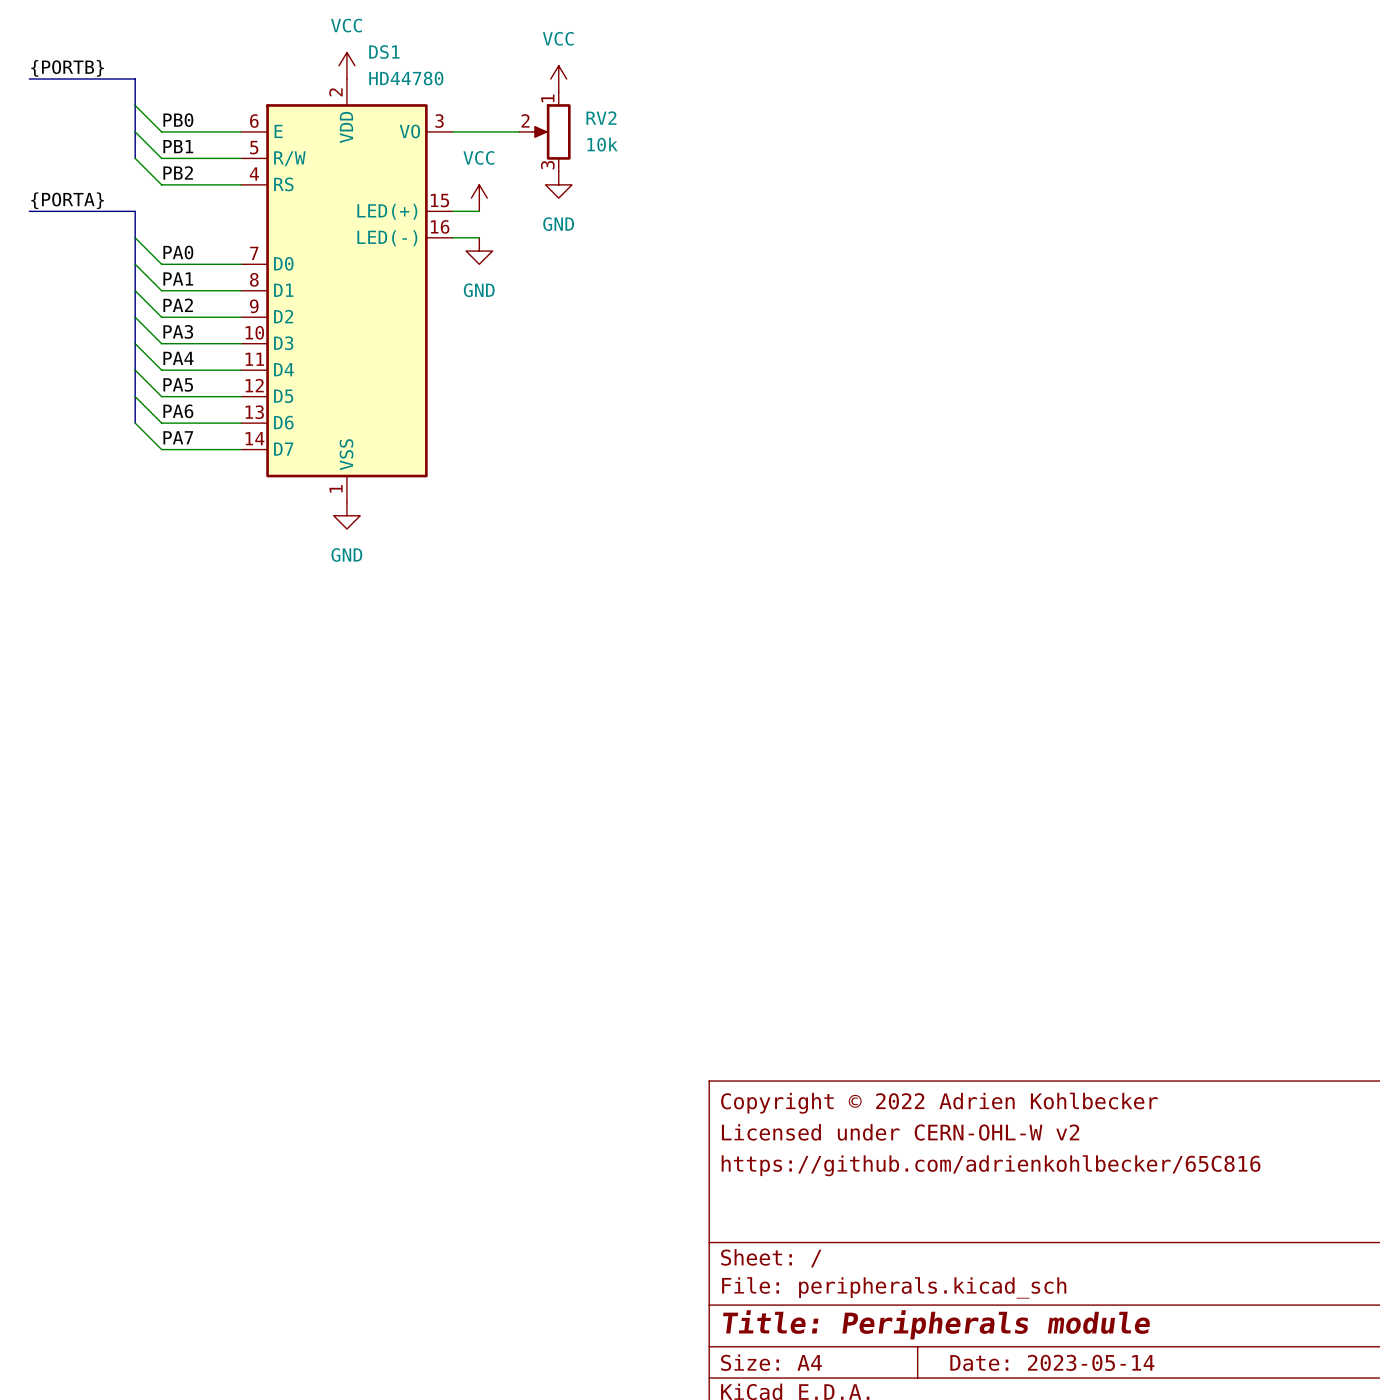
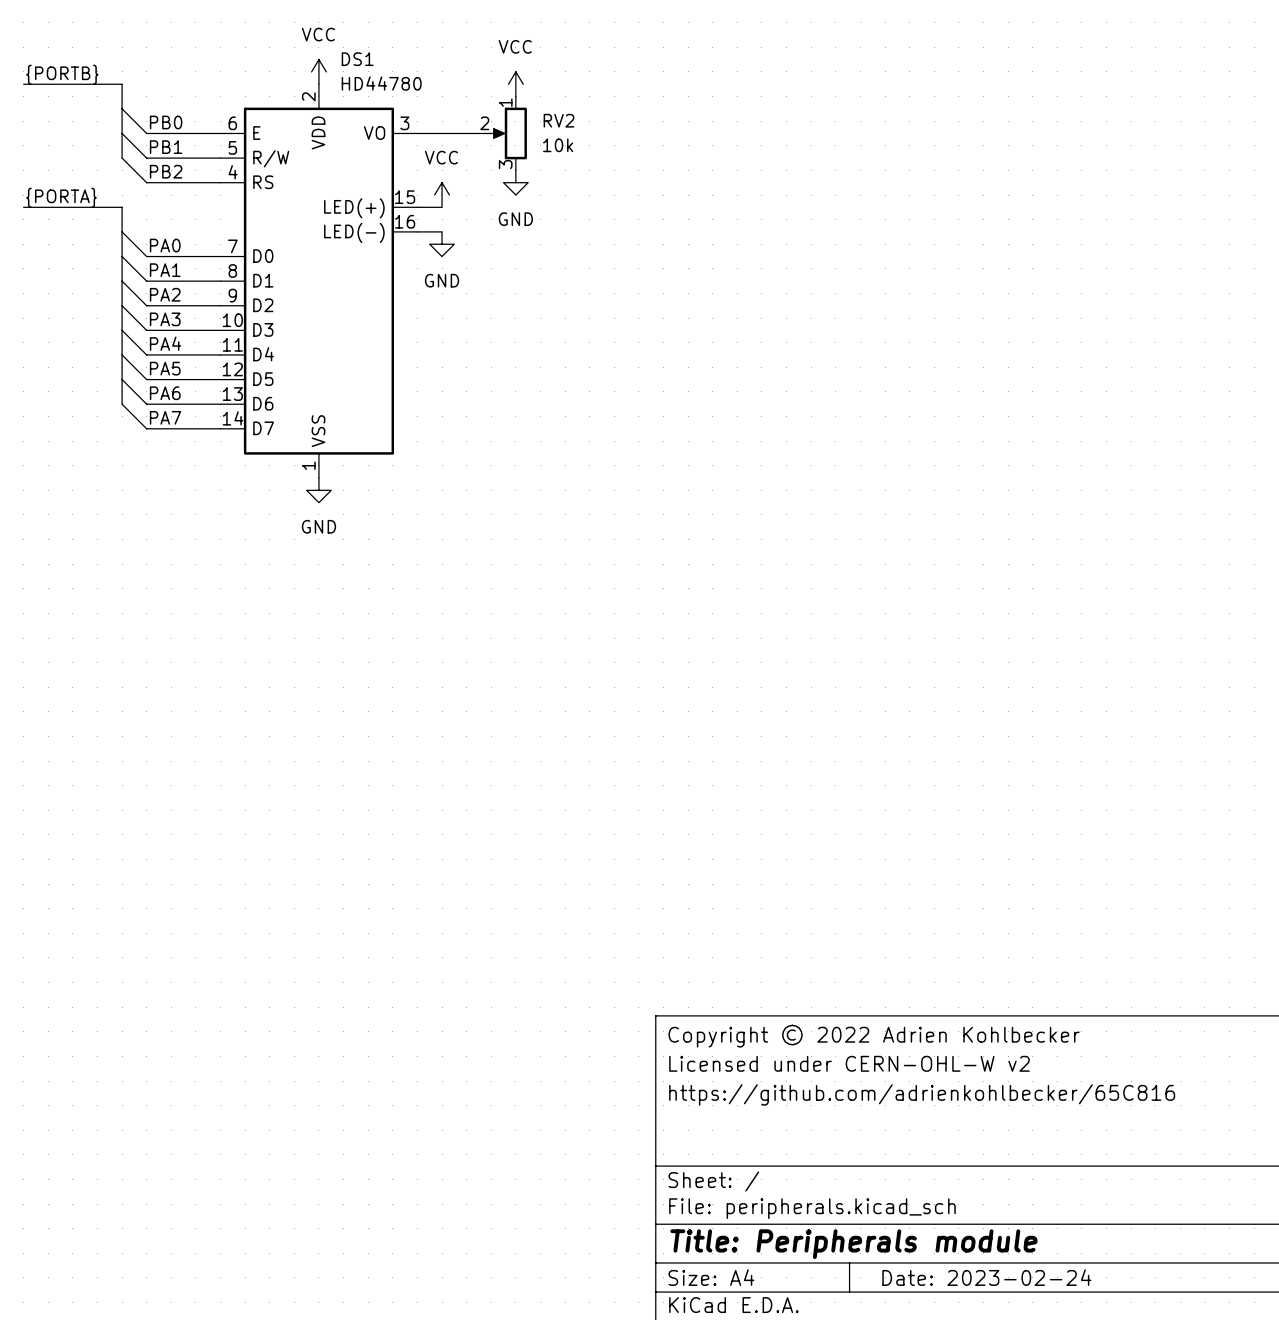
title block: Date: 2023-05-14 (1052, 1362) -> Date: 2023-02-24 (986, 1277)

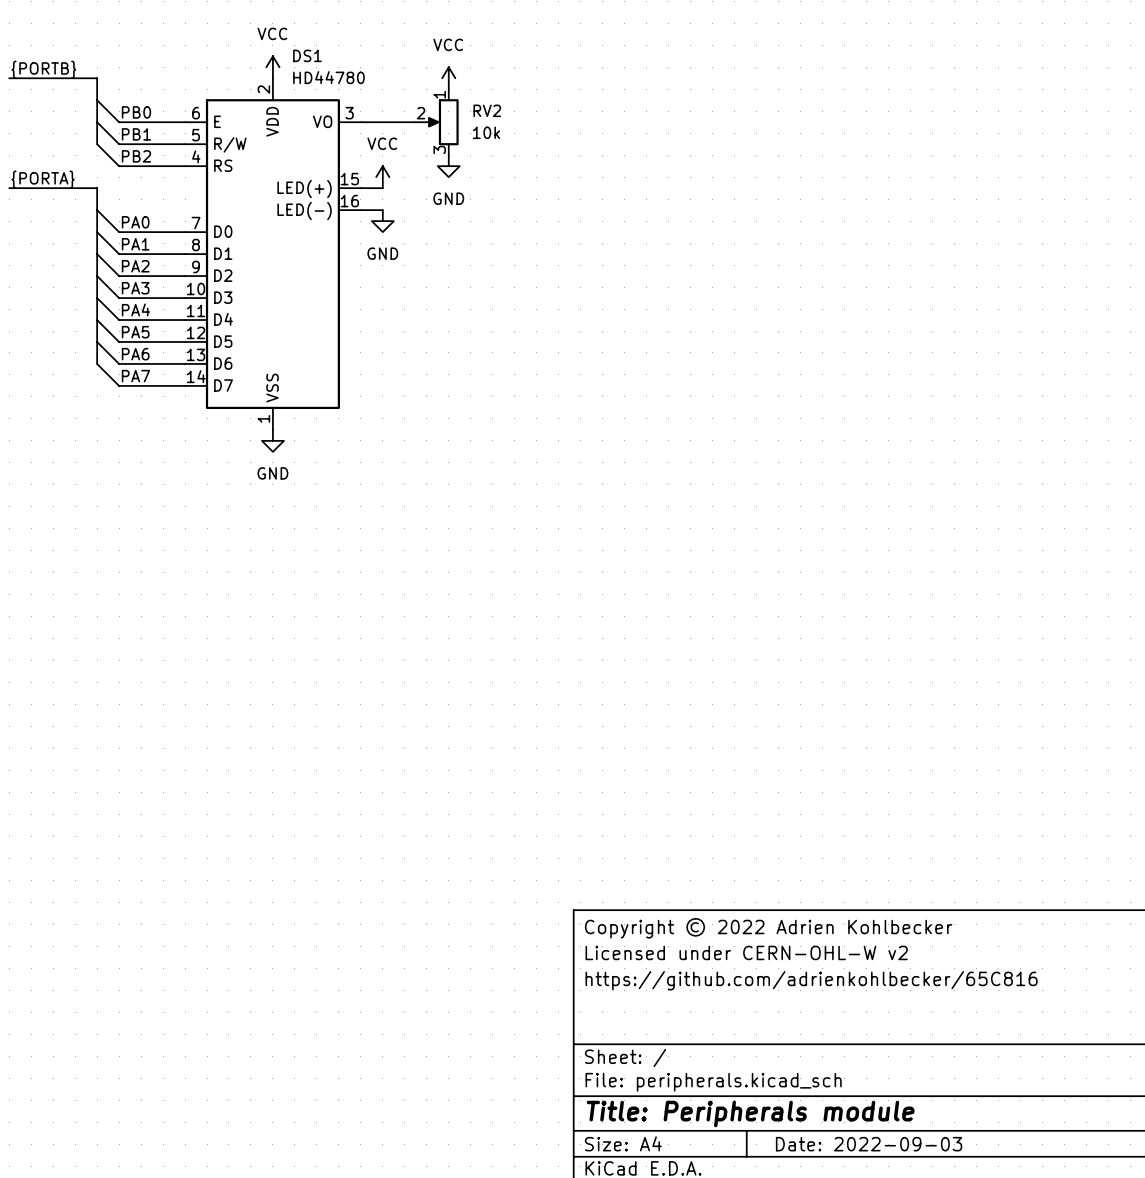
title block: Date: 2023-02-24 (986, 1277) -> Date: 2022-09-03 (869, 1144)

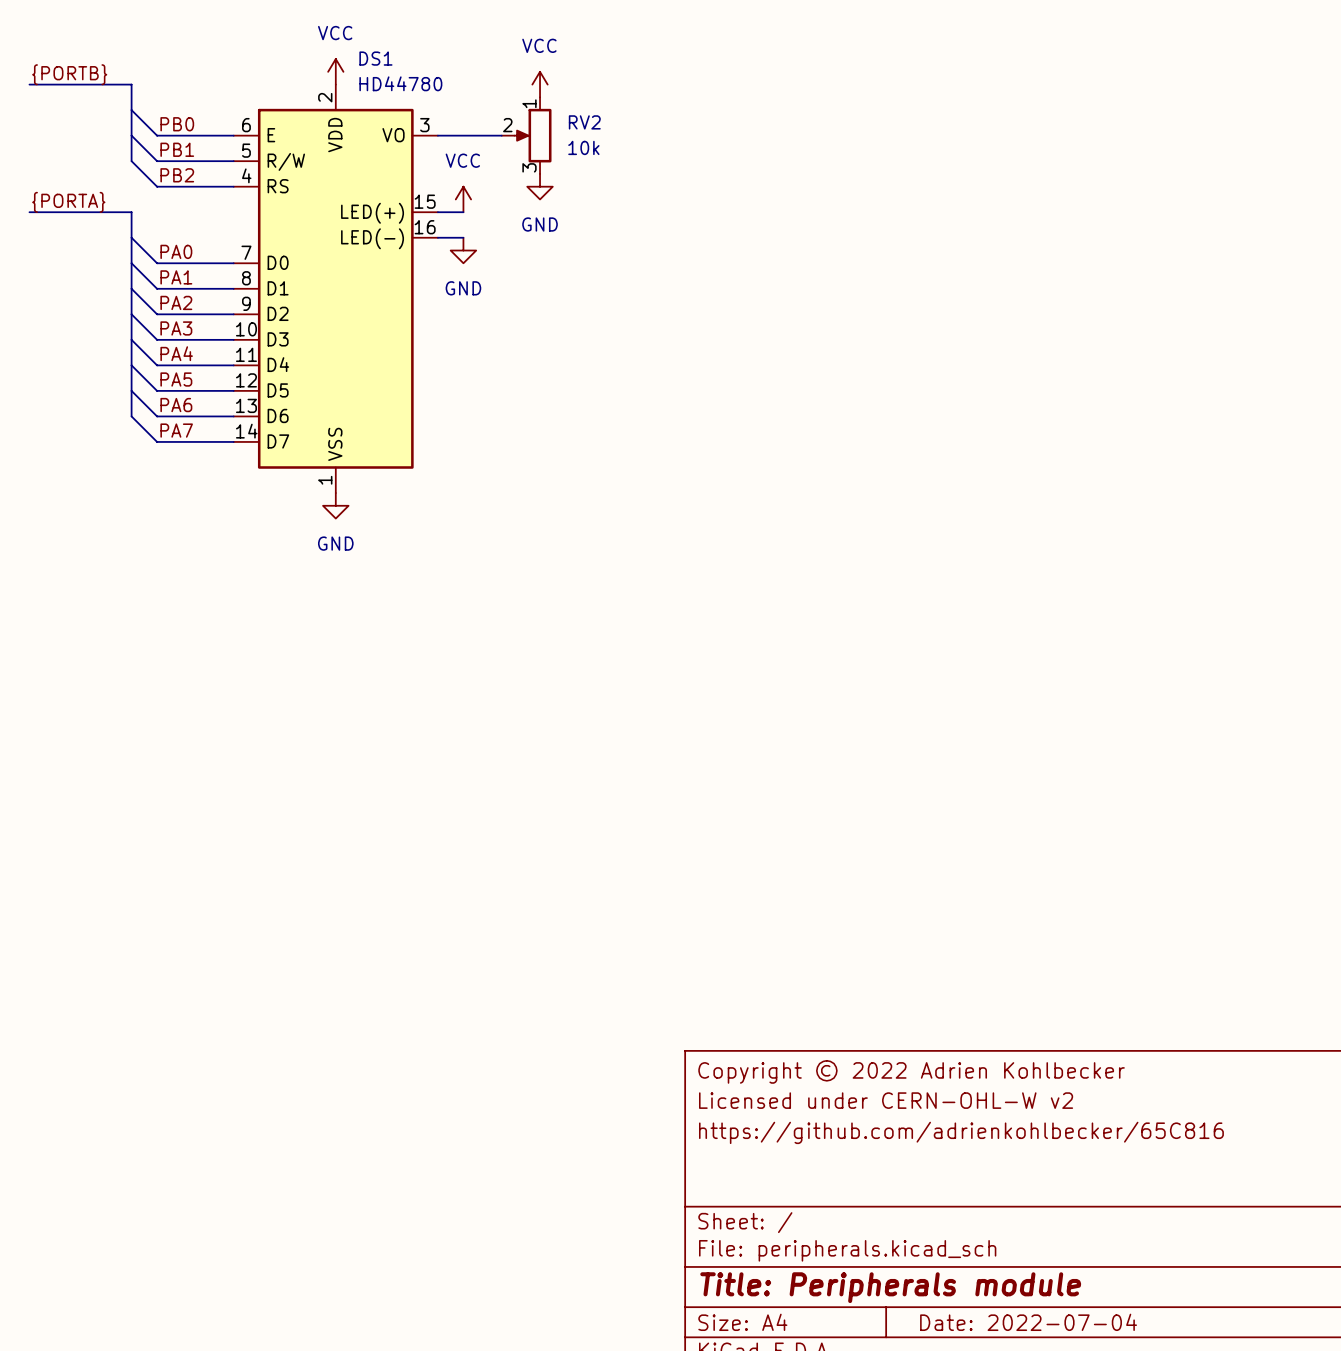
title block: Date: 2022-09-03 (869, 1144) -> Date: 2022-07-04 (1028, 1322)

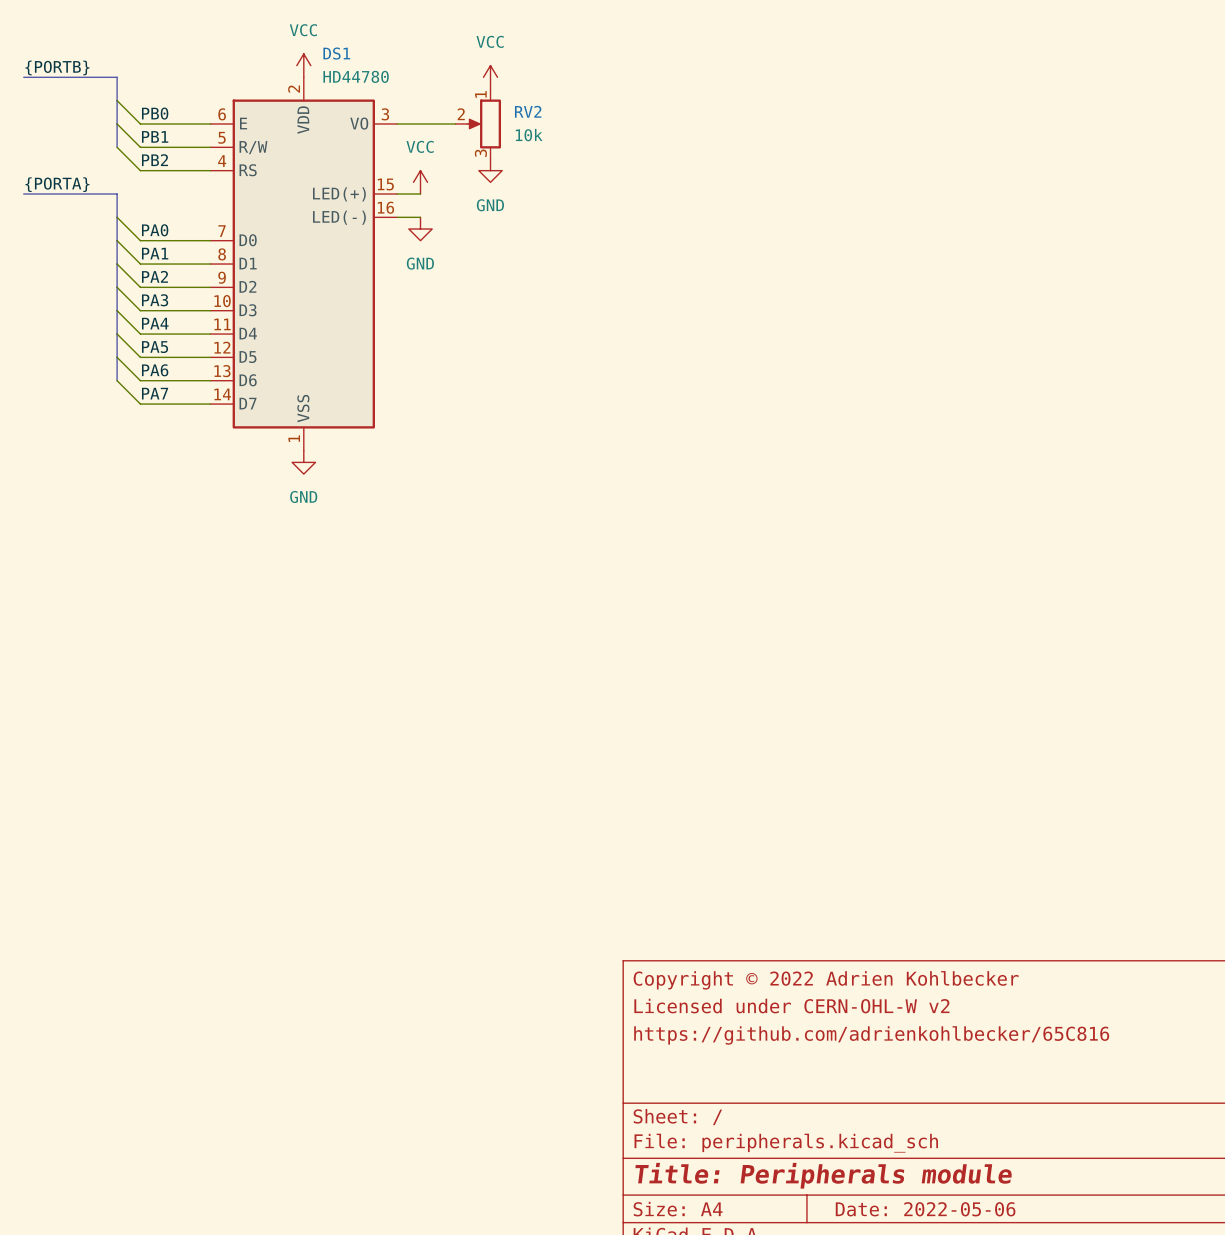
title block: Date: 2022-07-04 (1028, 1322) -> Date: 2022-05-06 (925, 1209)

